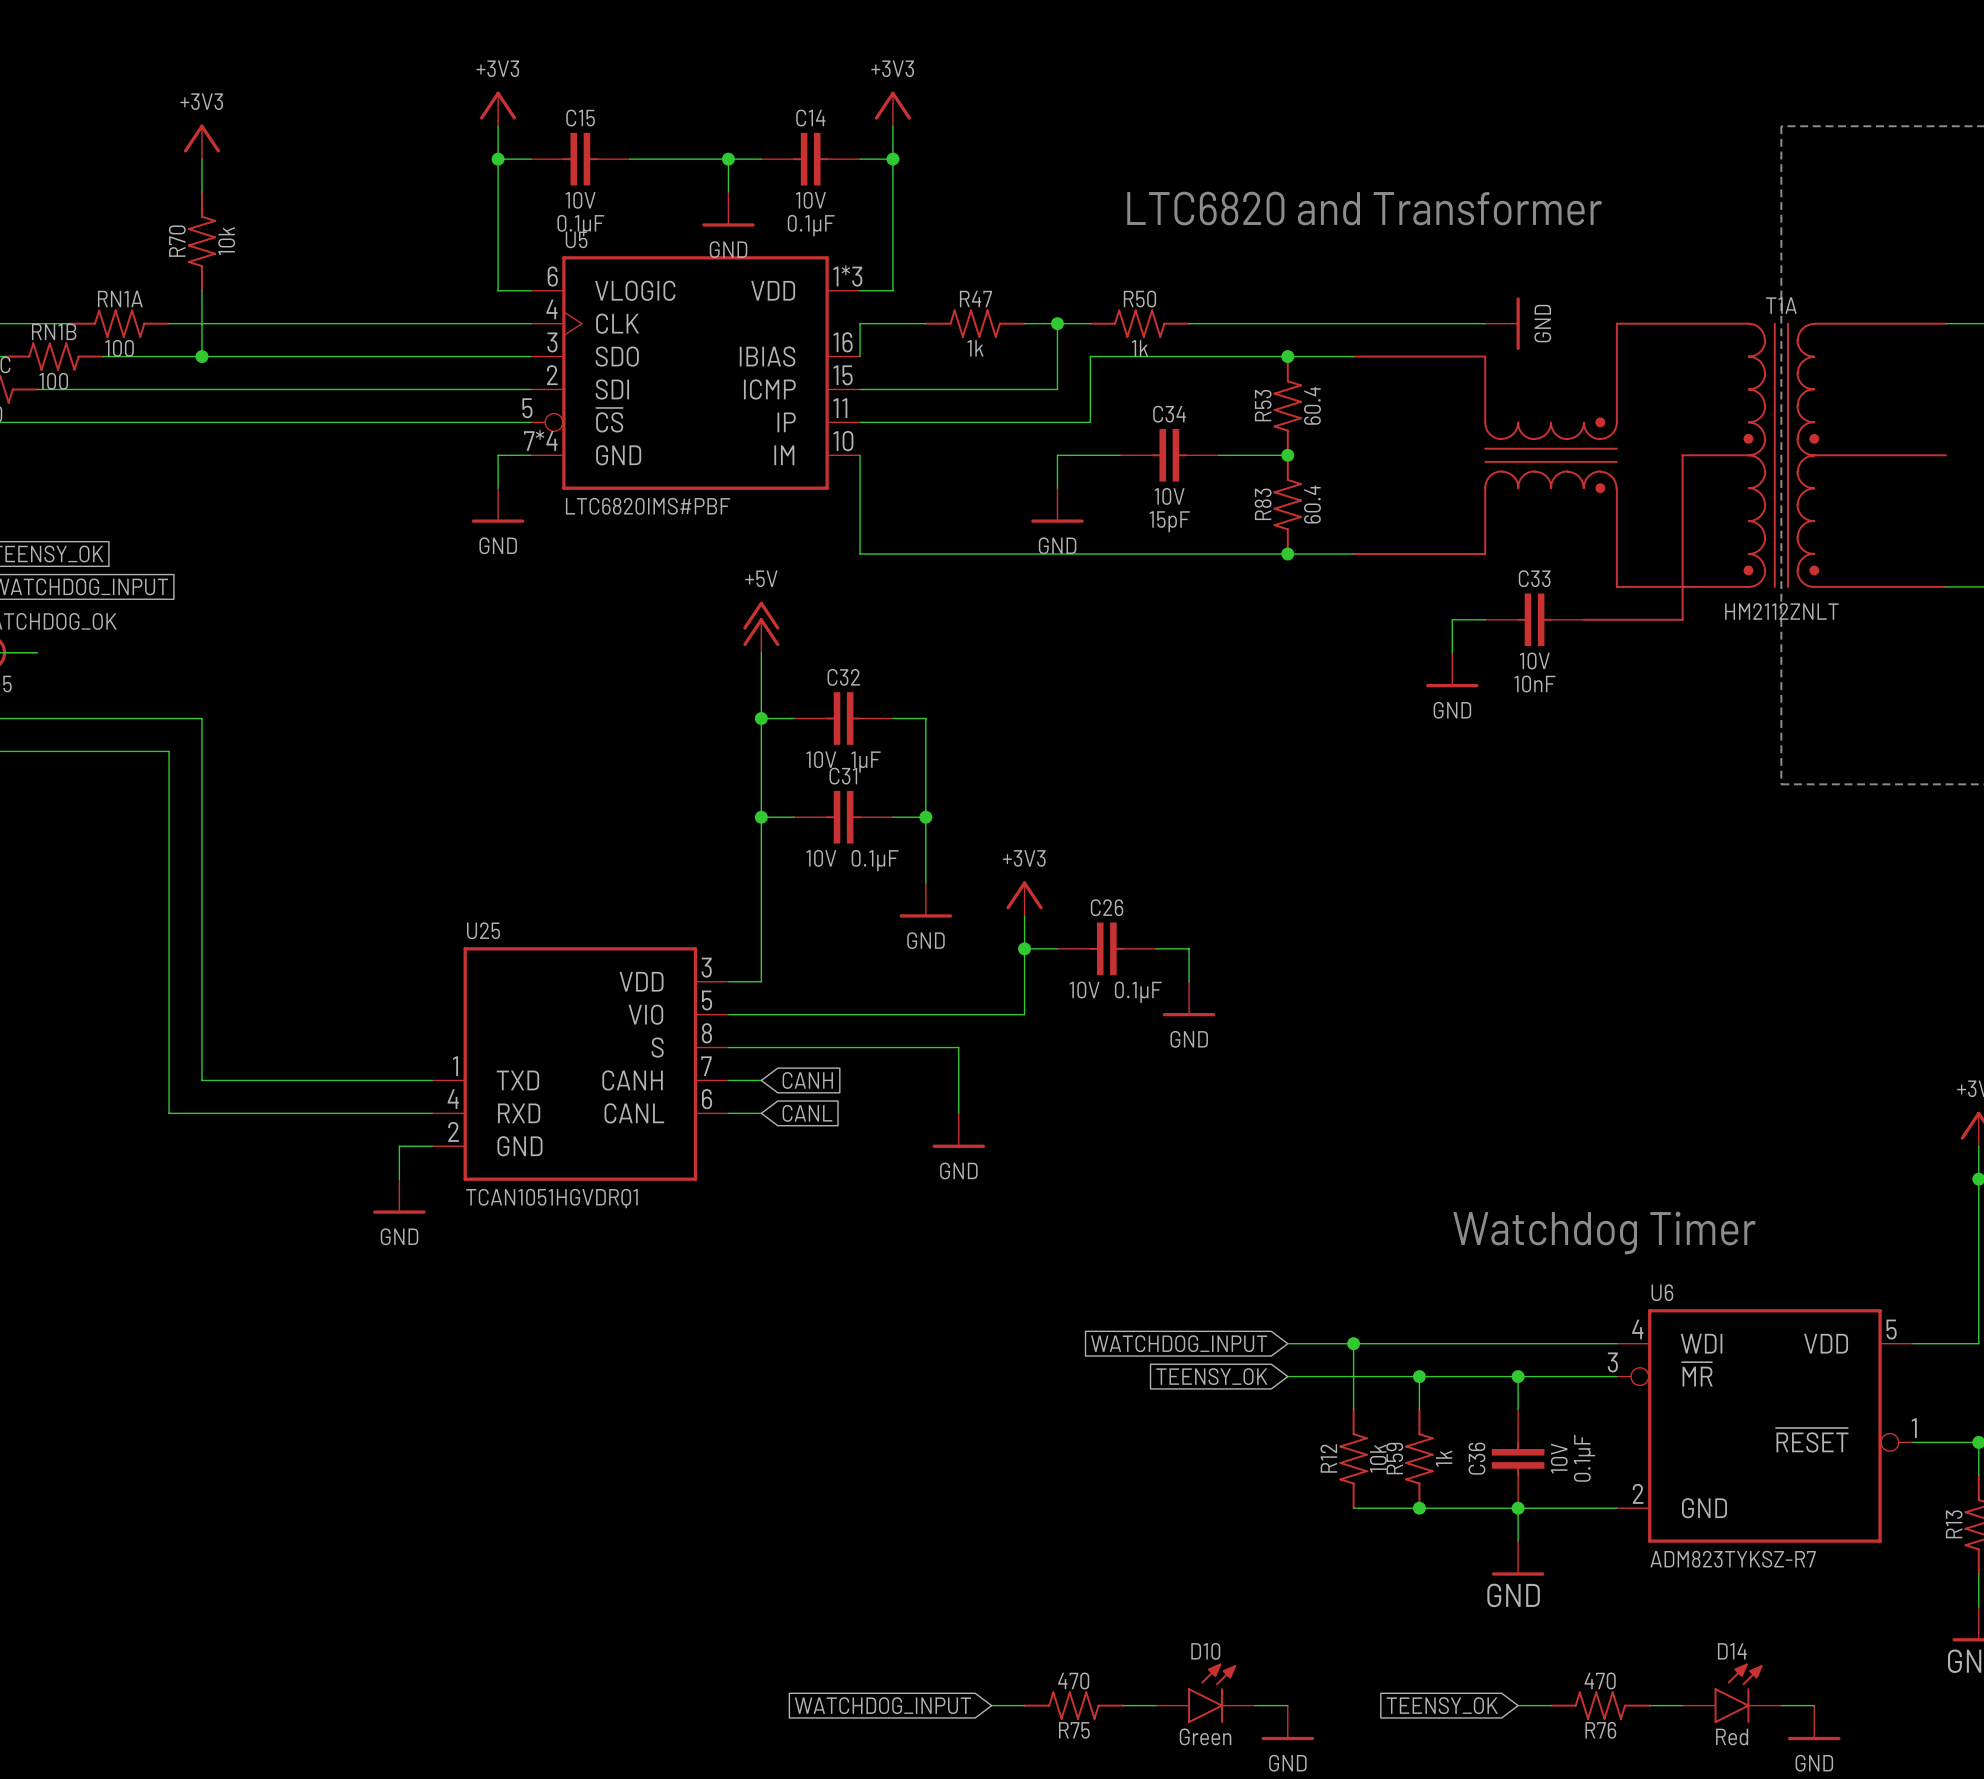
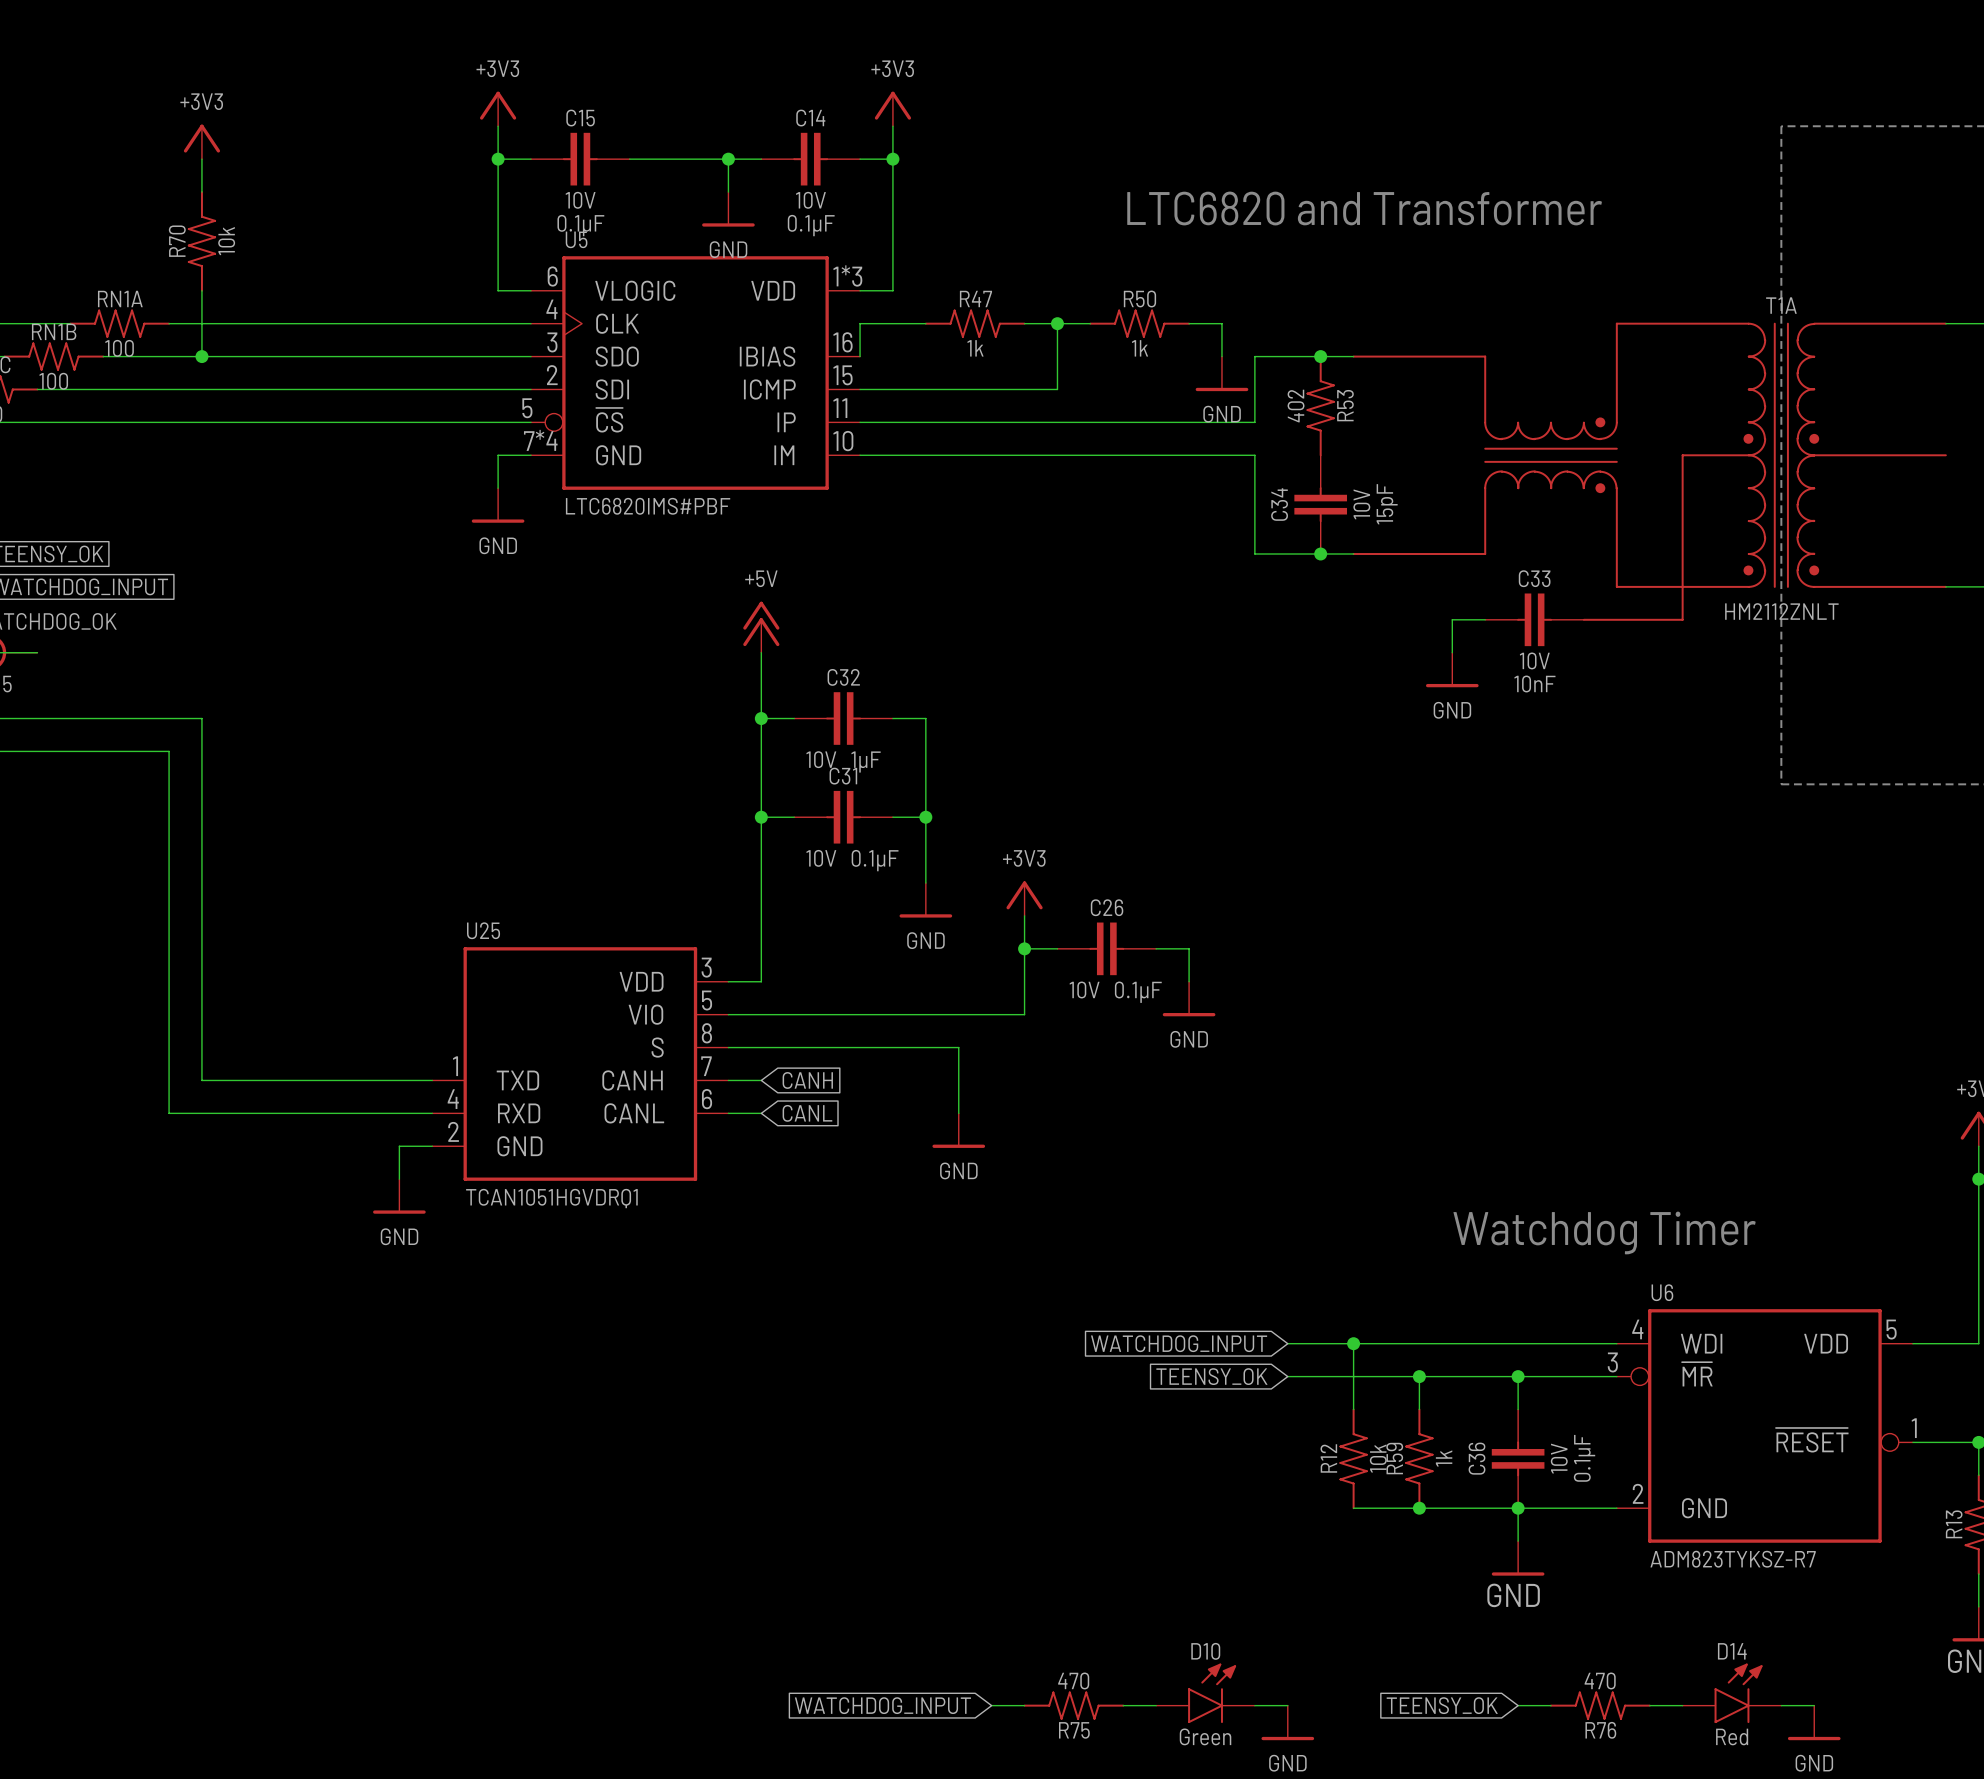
wire: (1221, 323) (1485, 323) -> (1221, 323) (1221, 356)
power symbol: GND (1502, 323) -> none
wire: (1254, 356) (1090, 356) (1090, 422) -> (1254, 356) (1254, 422) (1090, 422)
junction position: (1287, 356) -> (1320, 356)
power symbol: none -> GND (1221, 373)
R53 name position: R53 (1263, 405) -> R53 (1345, 405)
R53 position: (1287, 405) -> (1320, 405)
R53 text: 60.4 (1312, 405) -> 402 (1296, 406)
C34 name position: C34 (1169, 414) -> C34 (1279, 504)
wire: (860, 455) (860, 554) (1254, 554) -> none
wire: (1057, 455) (1057, 488) -> (1057, 455) (860, 455)
C34 rotation: 0° (1169, 455) -> 90° clockwise (1320, 504)
C34 position: (1169, 455) -> (1320, 504)
wire: (1254, 455) (1287, 455) -> (1254, 455) (1254, 554)
junction: (1287, 455) -> none
C34 text position: 10V (1169, 496) -> 10V (1361, 504)
R83: (1287, 504) -> none
power symbol: GND (1057, 505) -> none
C34 text position: 15pF (1169, 521) -> 15pF (1387, 504)
junction position: (1287, 554) -> (1320, 554)

